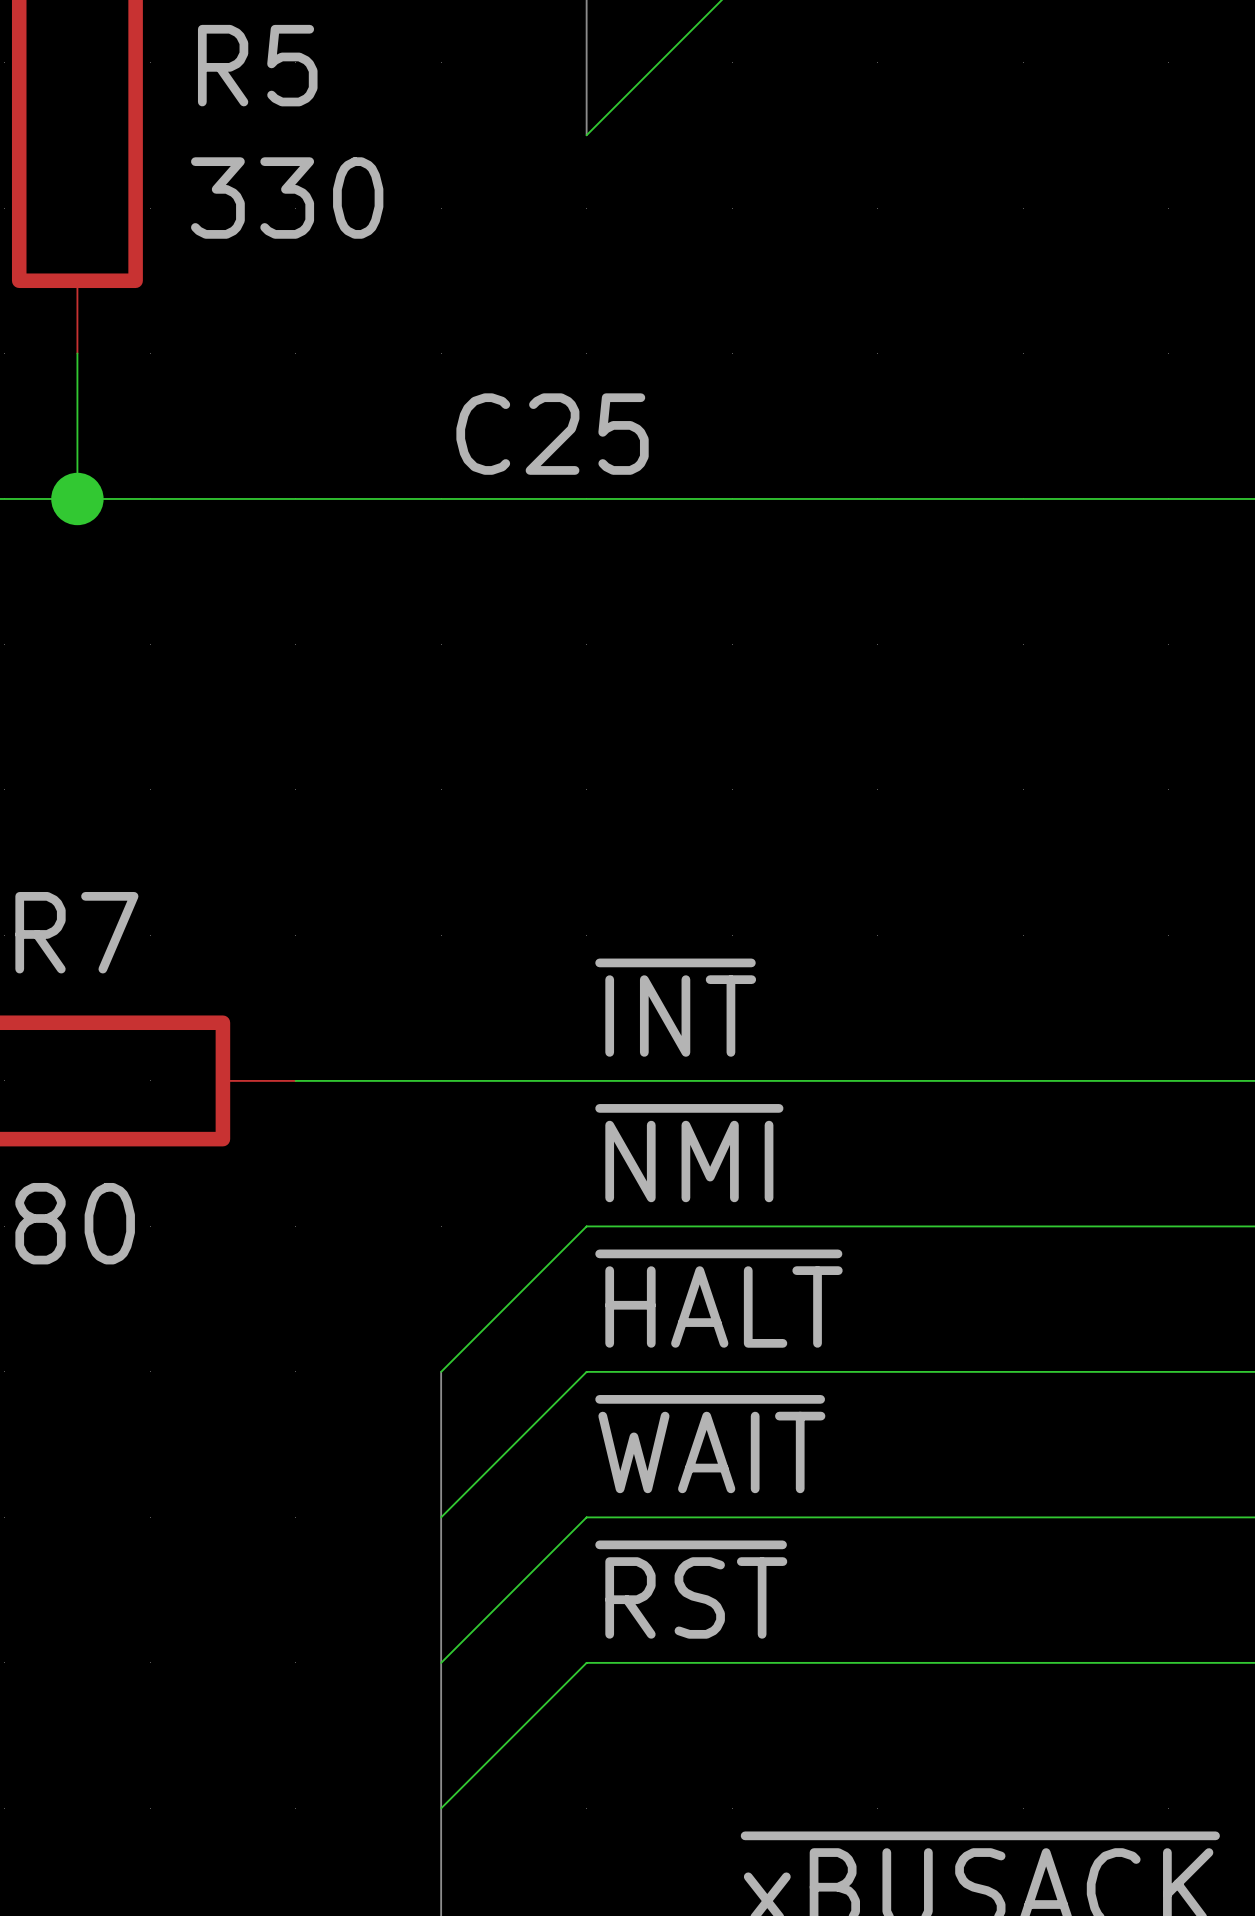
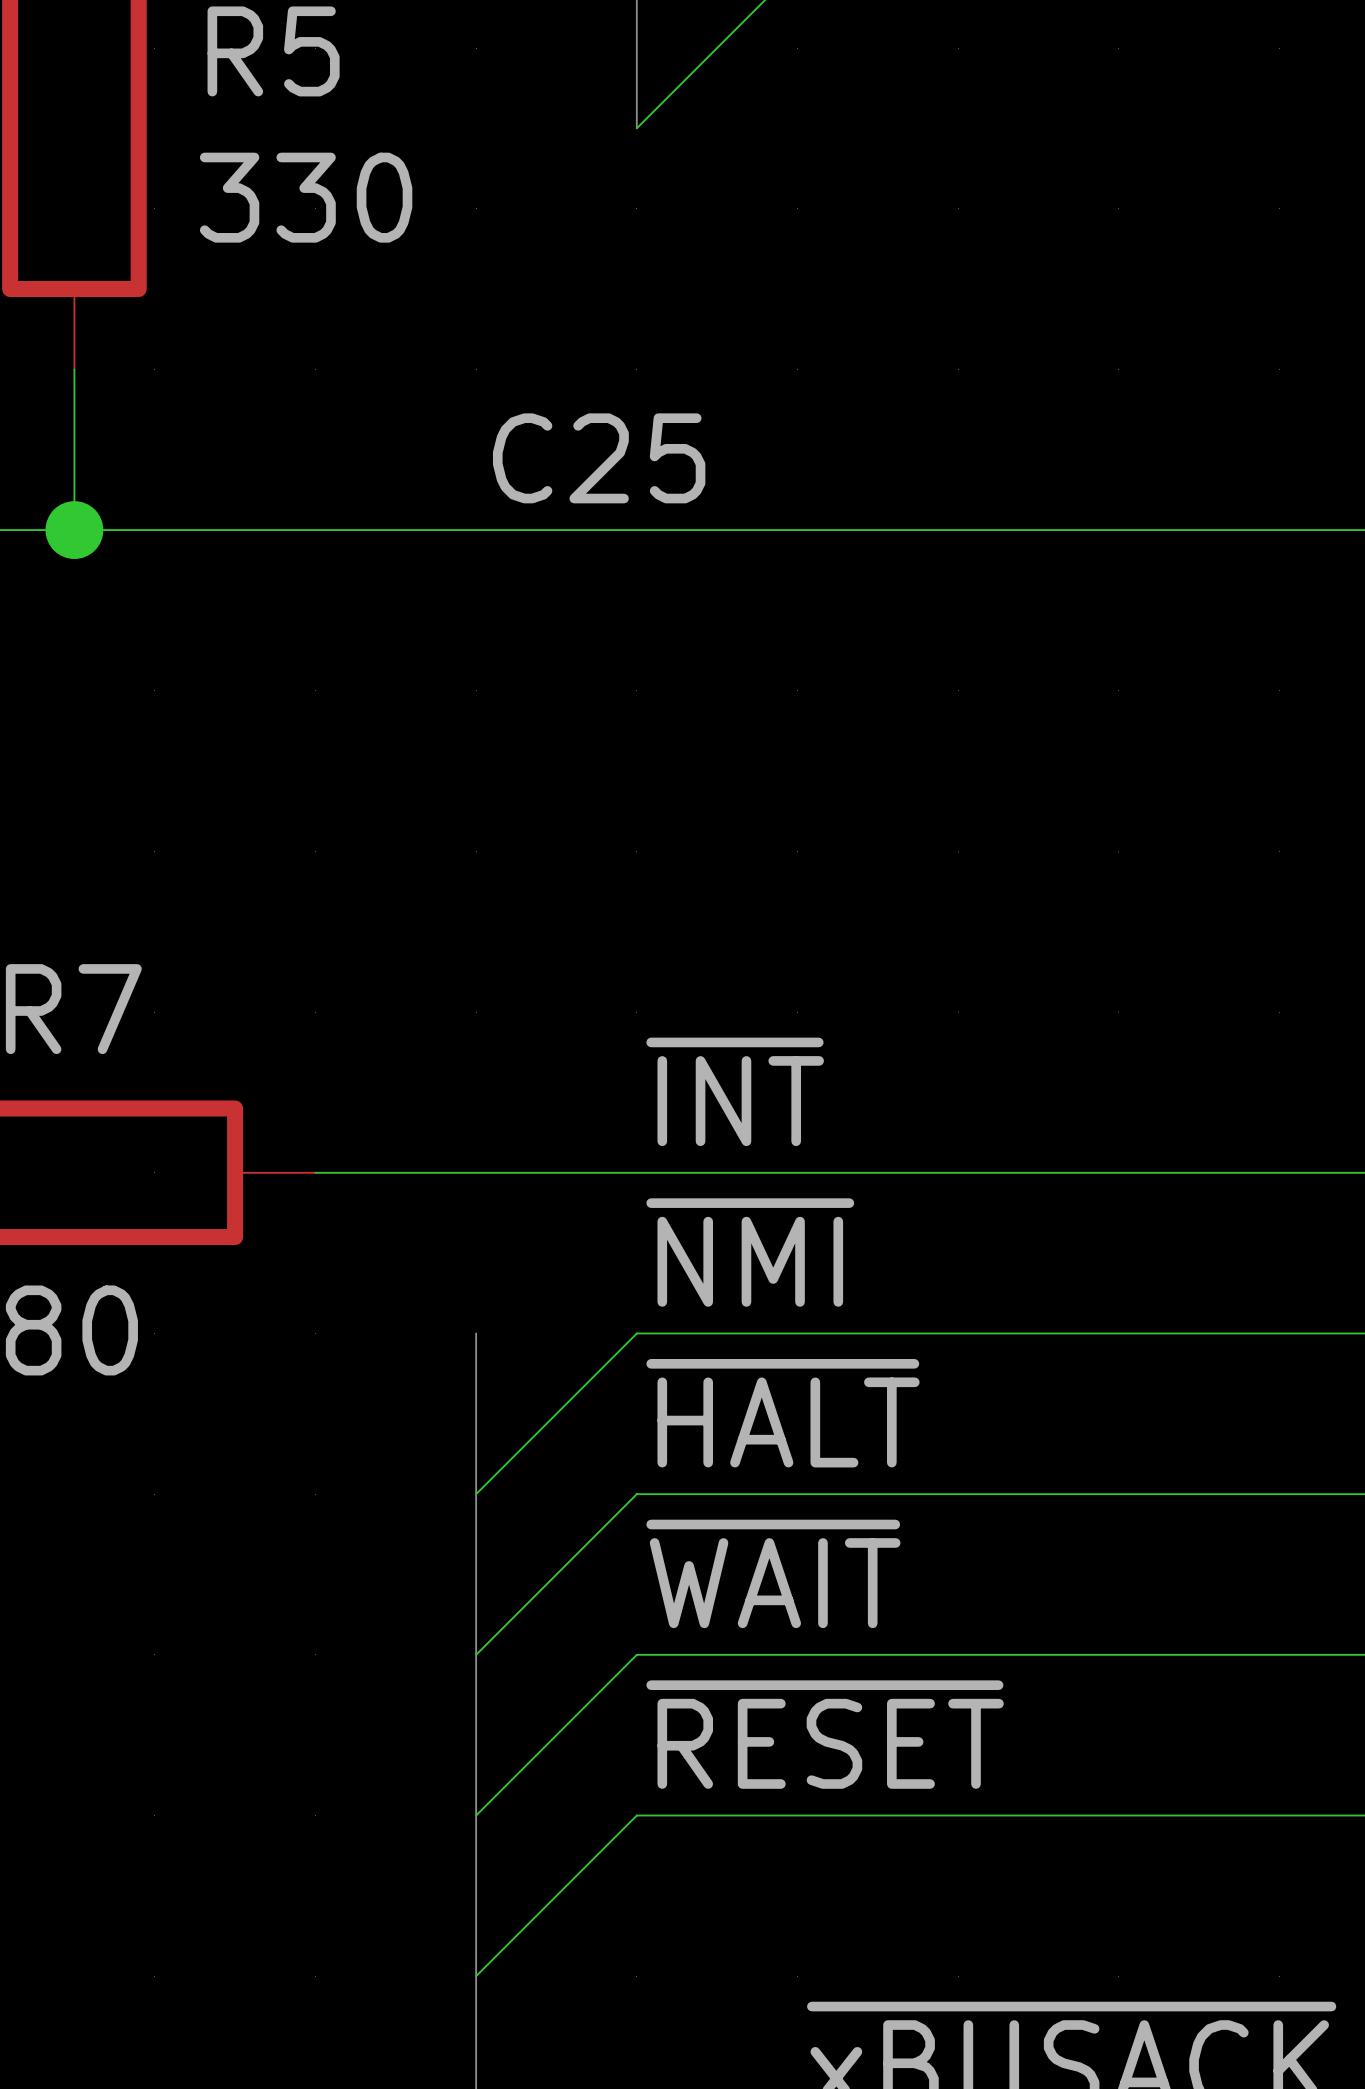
bus: none -> (476, 1333) (476, 1494)
label: ~{RST} (691, 1589) -> ~{RESET} (825, 1734)

